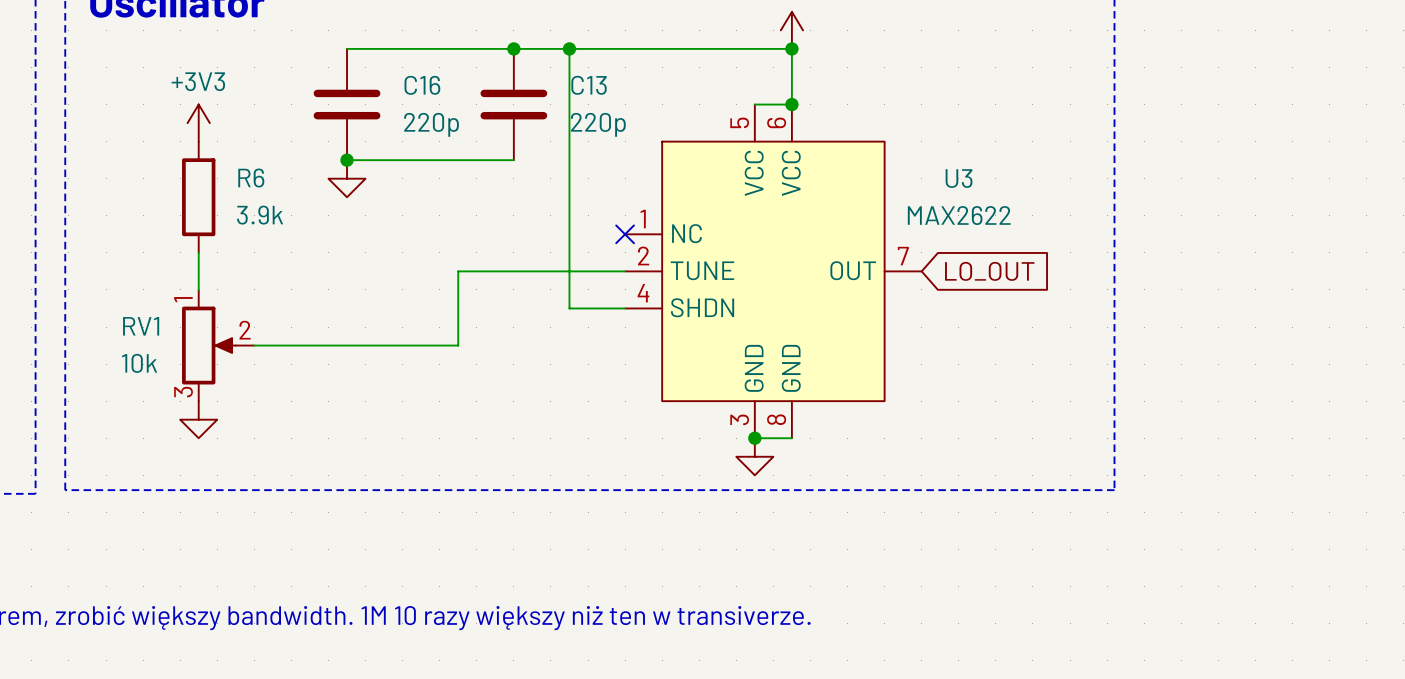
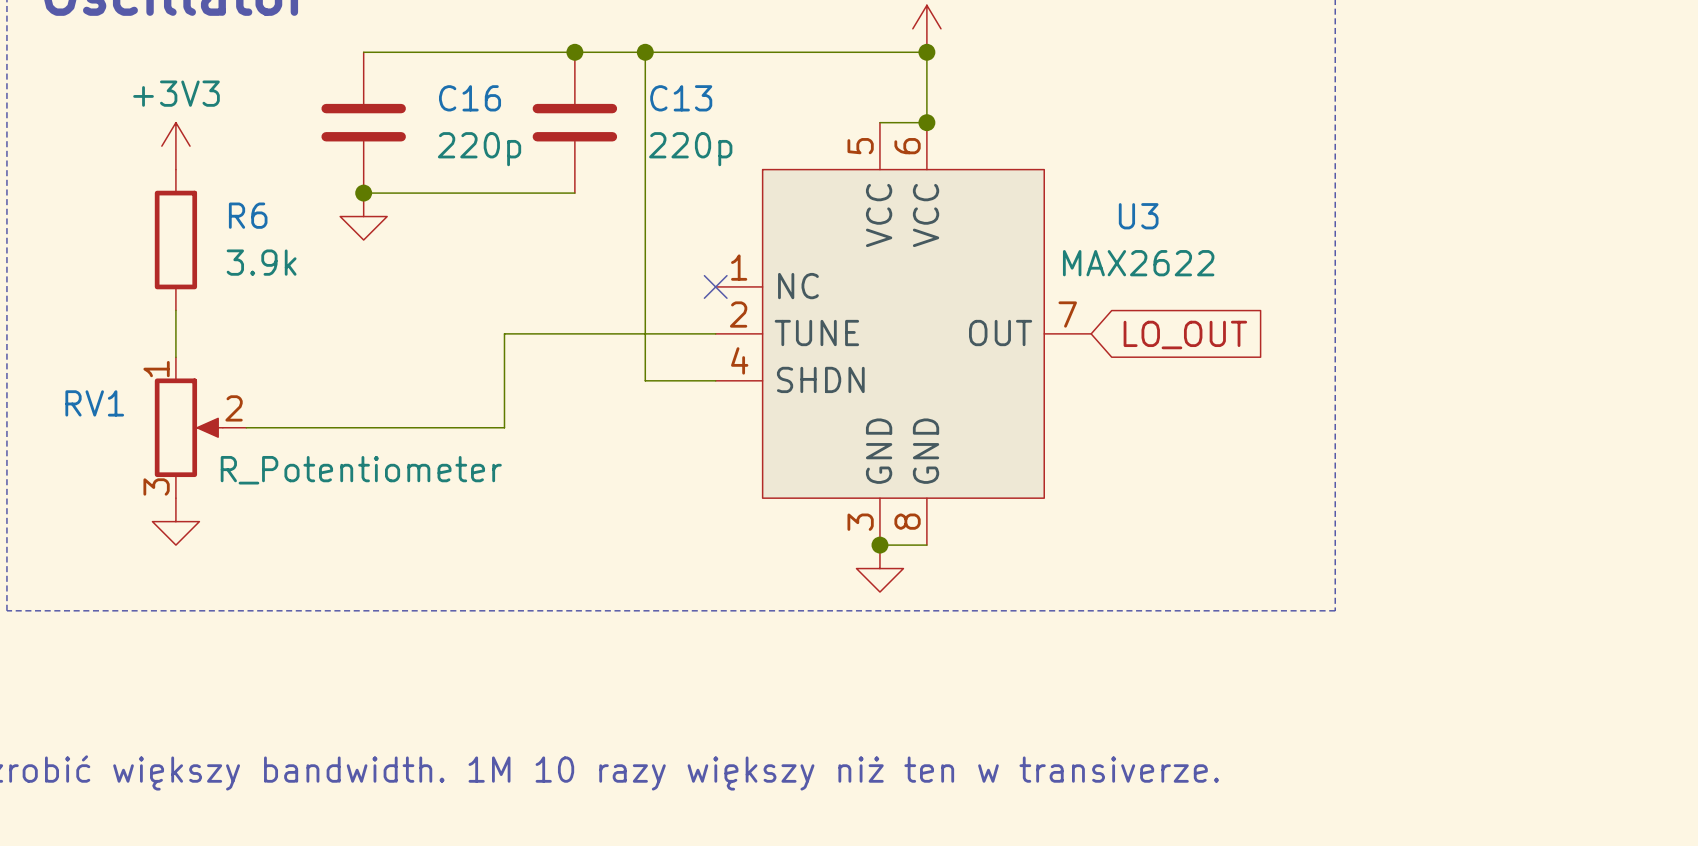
RV1 value: 10k (139, 363) -> R_Potentiometer (361, 470)

